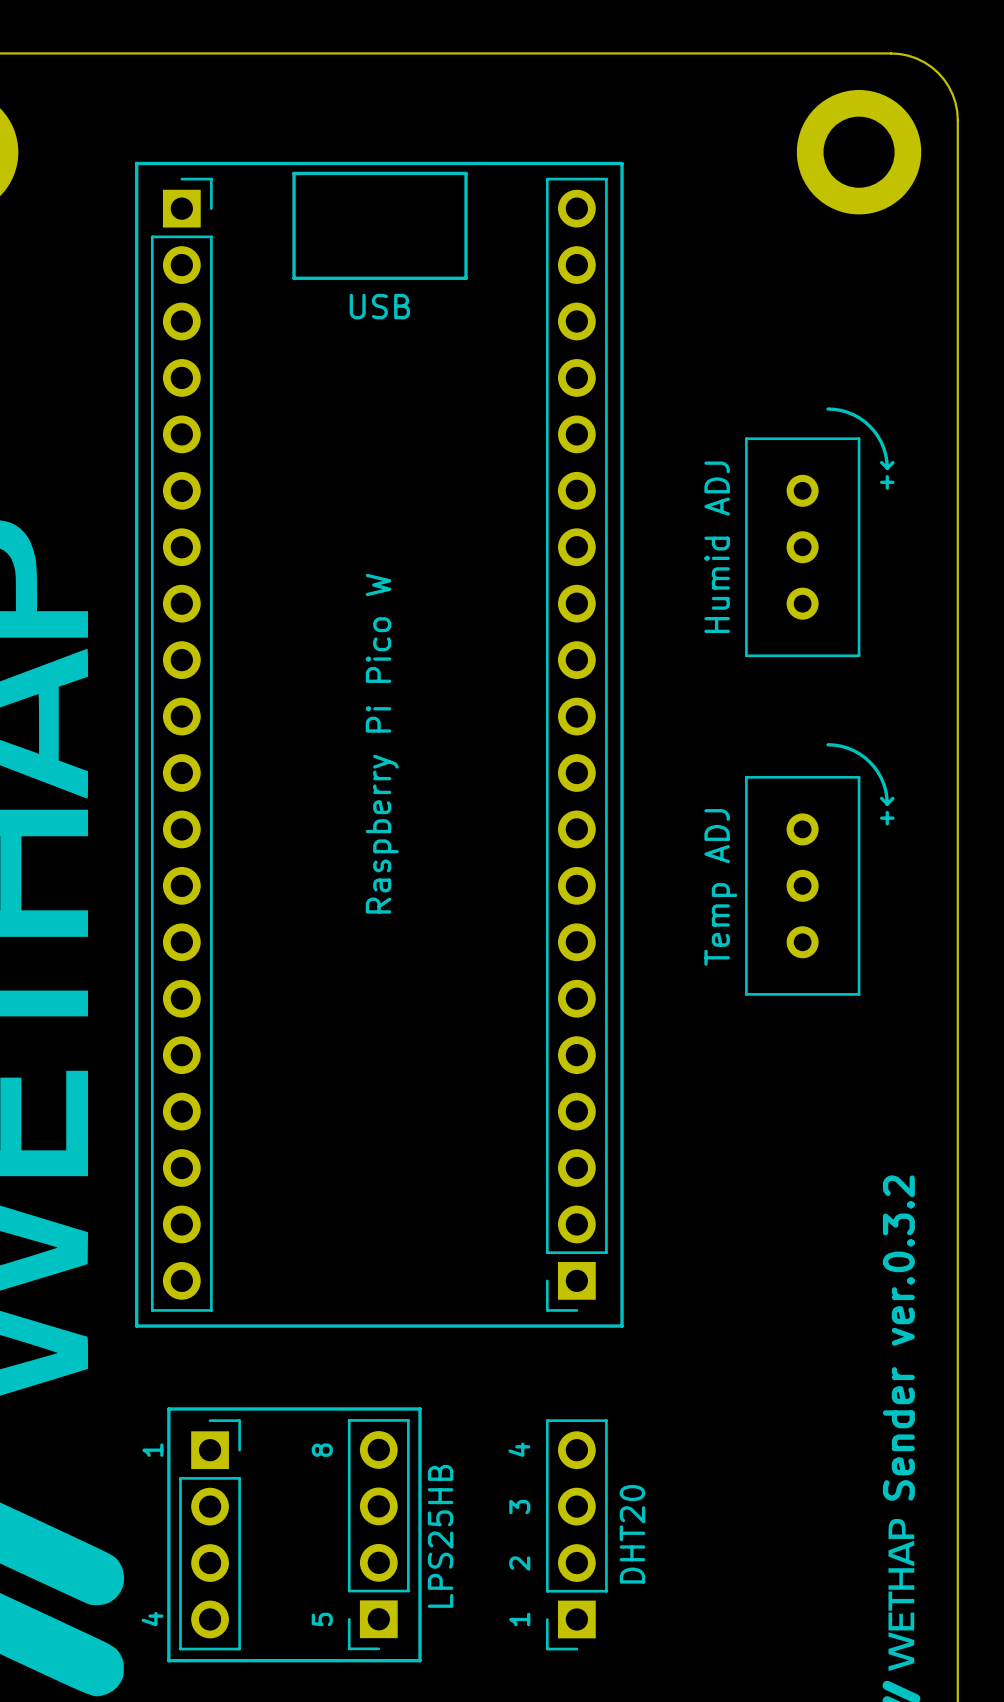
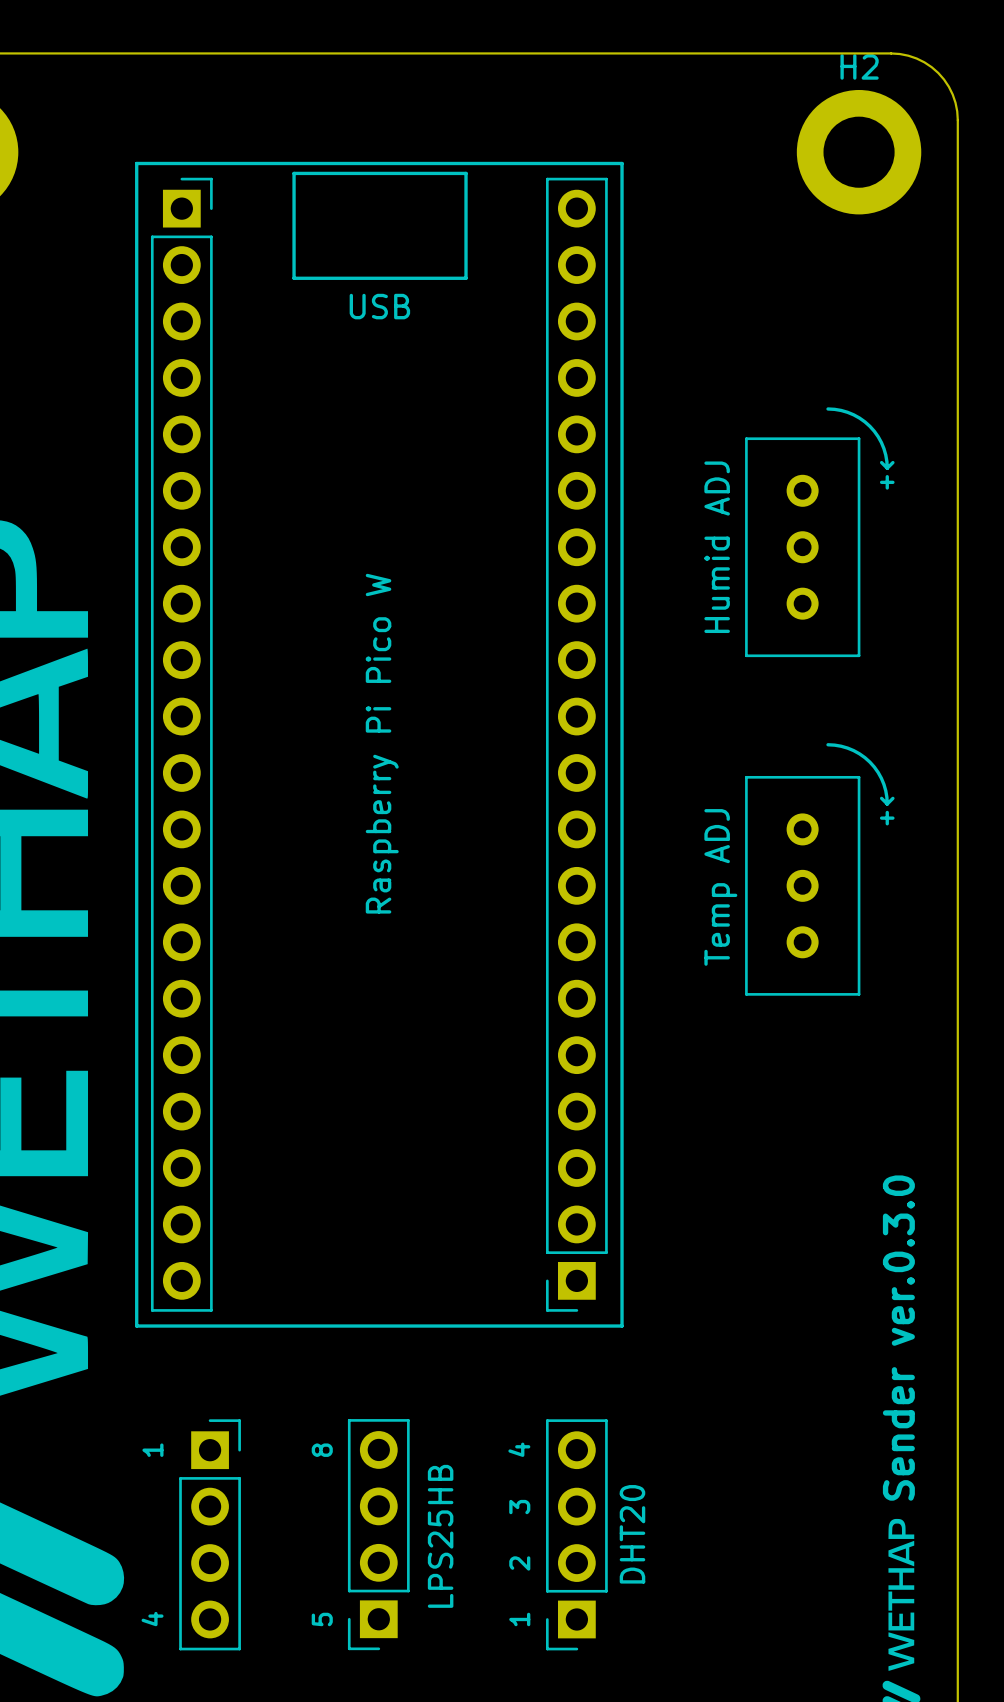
H2 name: none -> H2 (859, 66)
text: Sender ver.0.3.2 (898, 1338) -> Sender ver.0.3.0 (898, 1338)
line: (168, 1408) (419, 1408) (419, 1660) (168, 1660) (168, 1408) -> none

